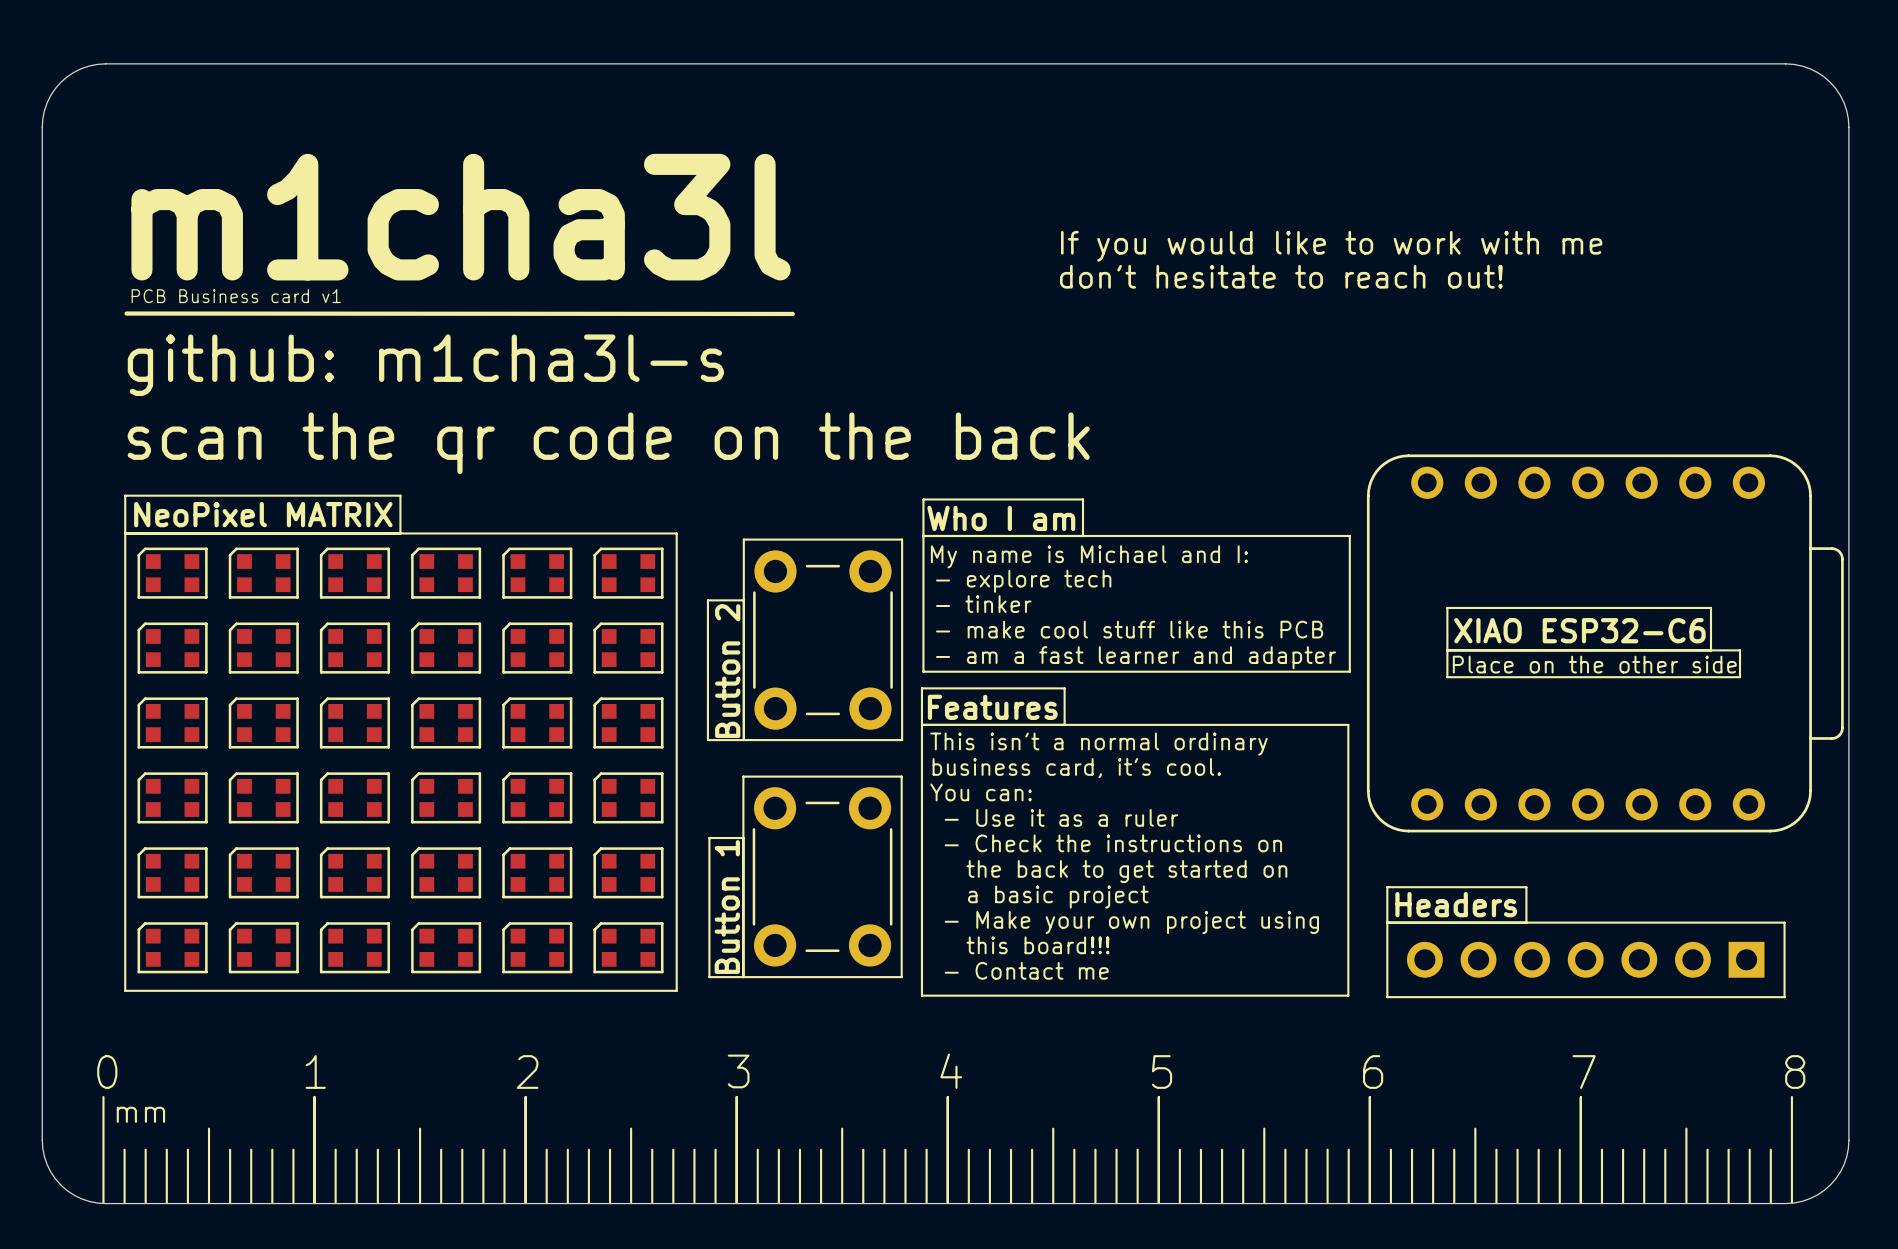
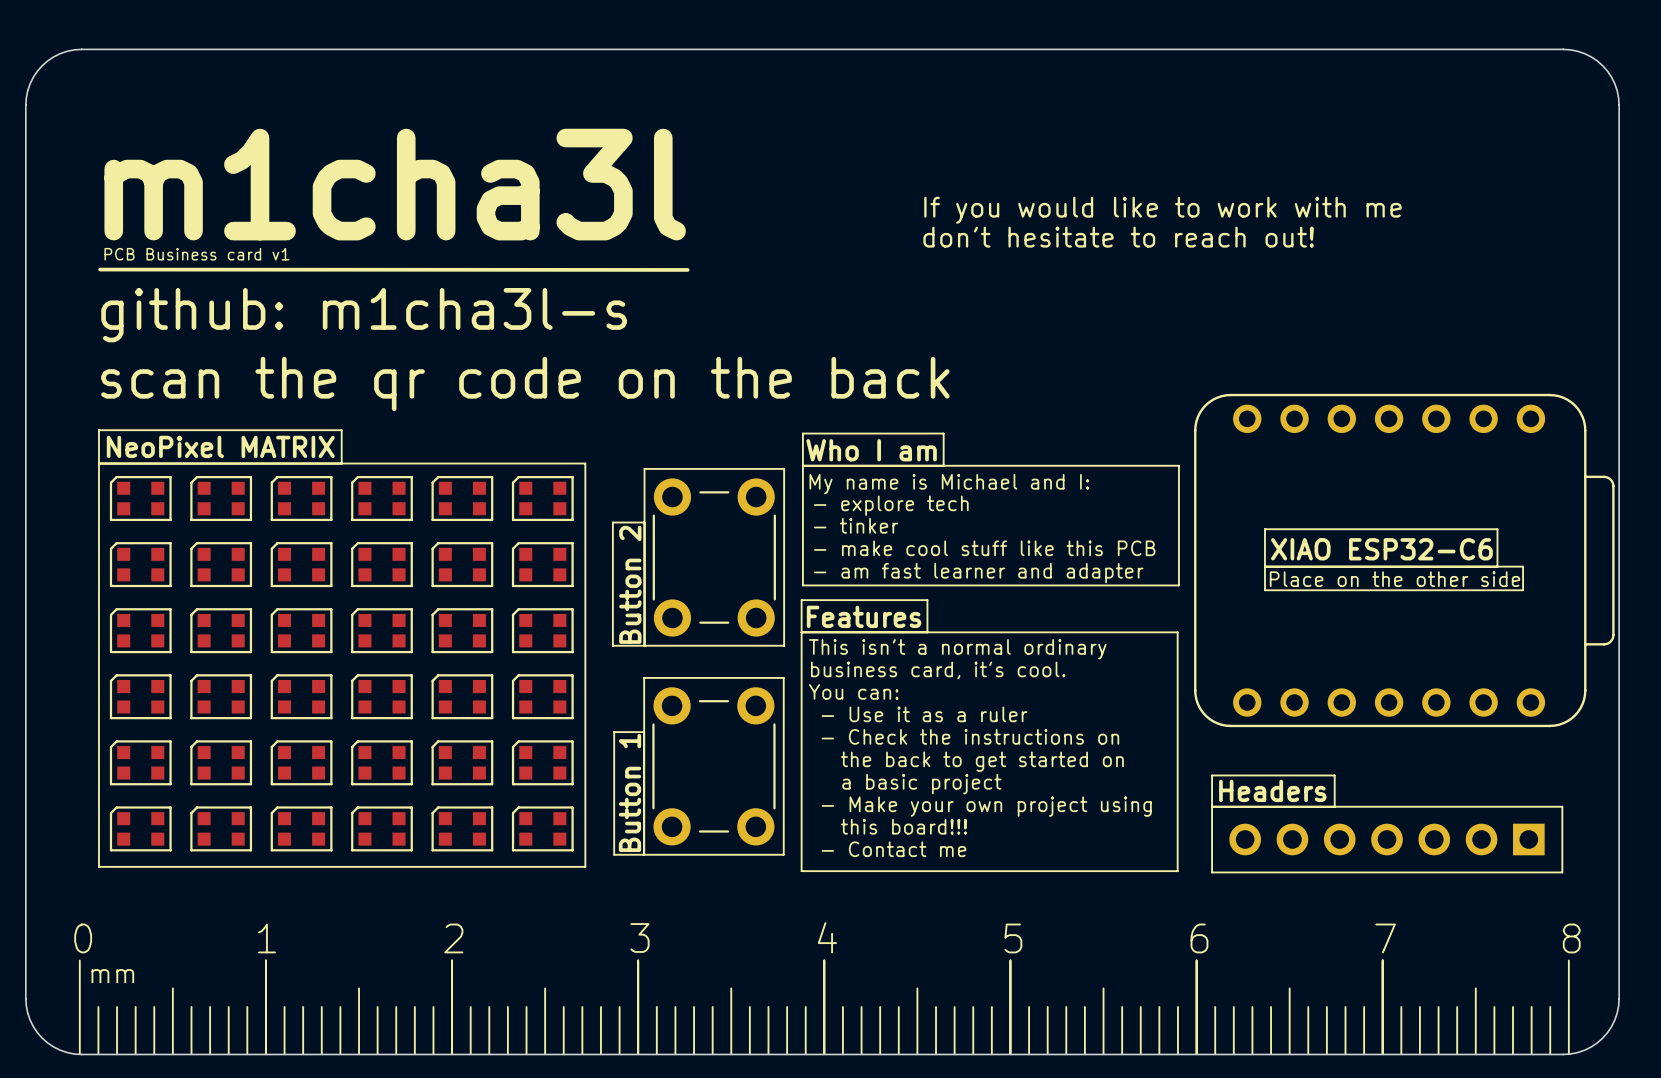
text: - am a fast learner and adapter (1136, 657) -> - am fast learner and adapter (978, 573)

